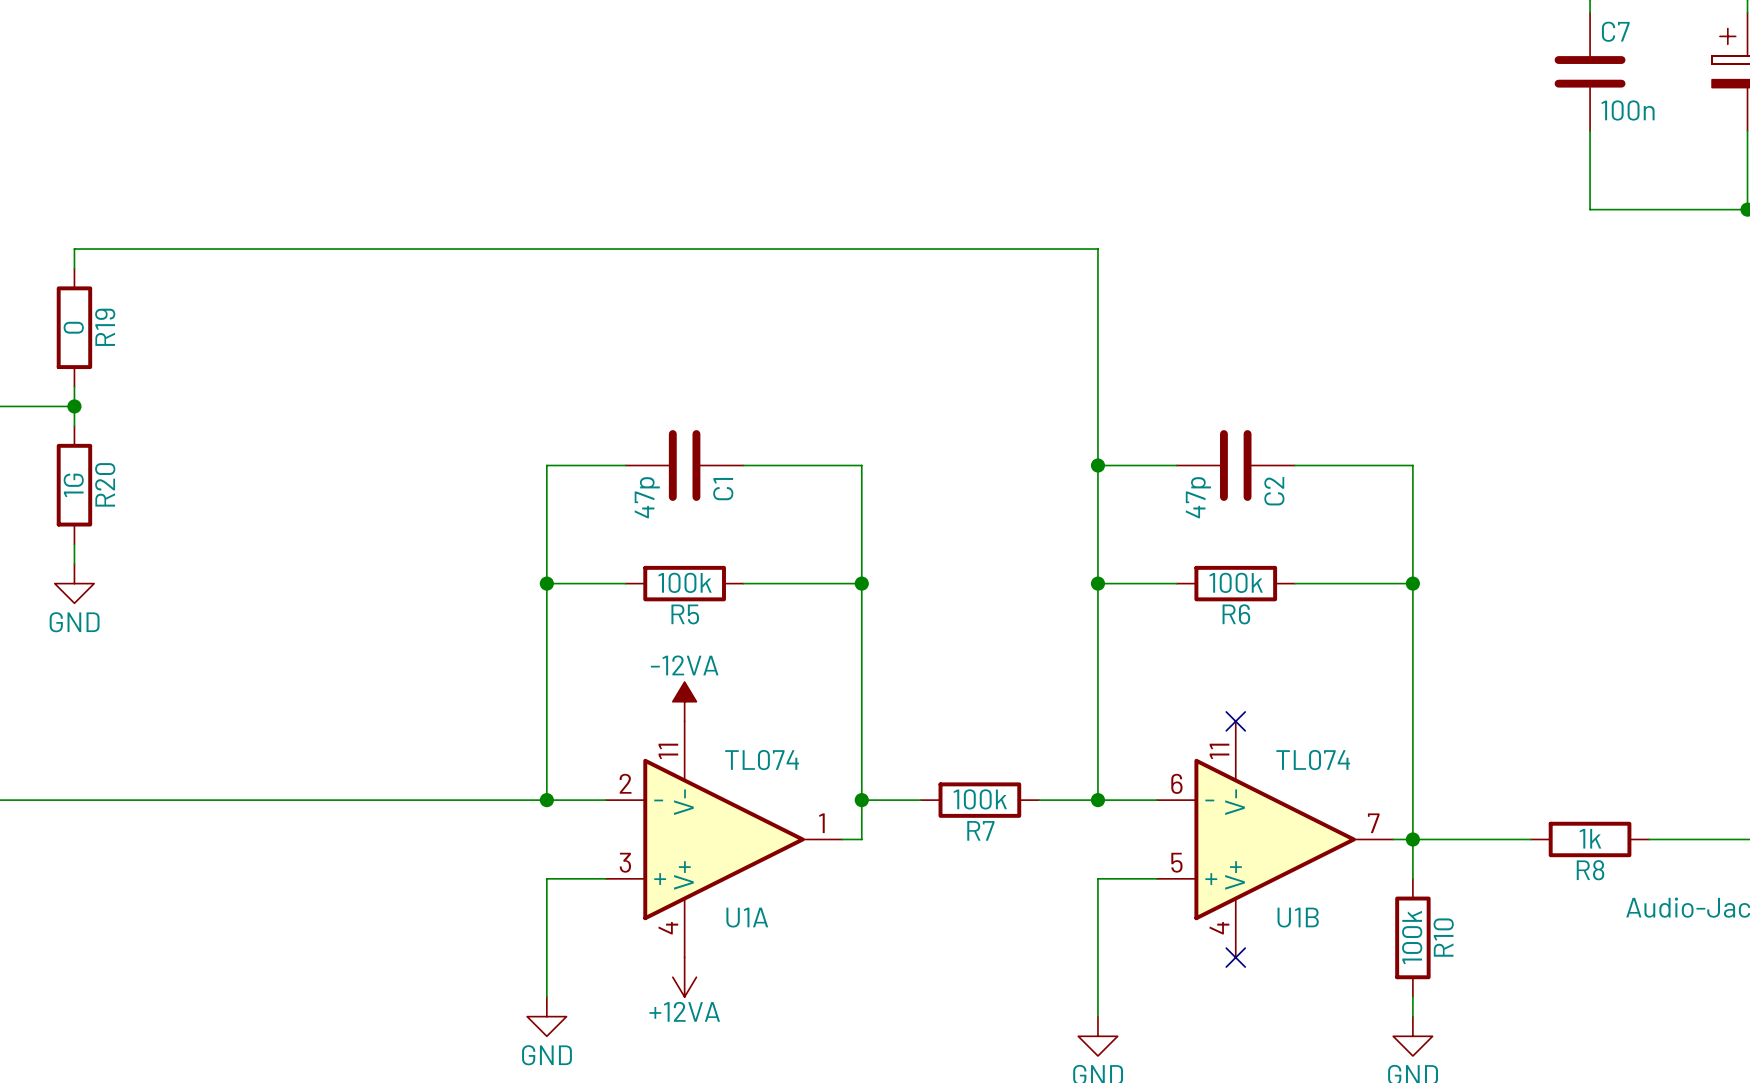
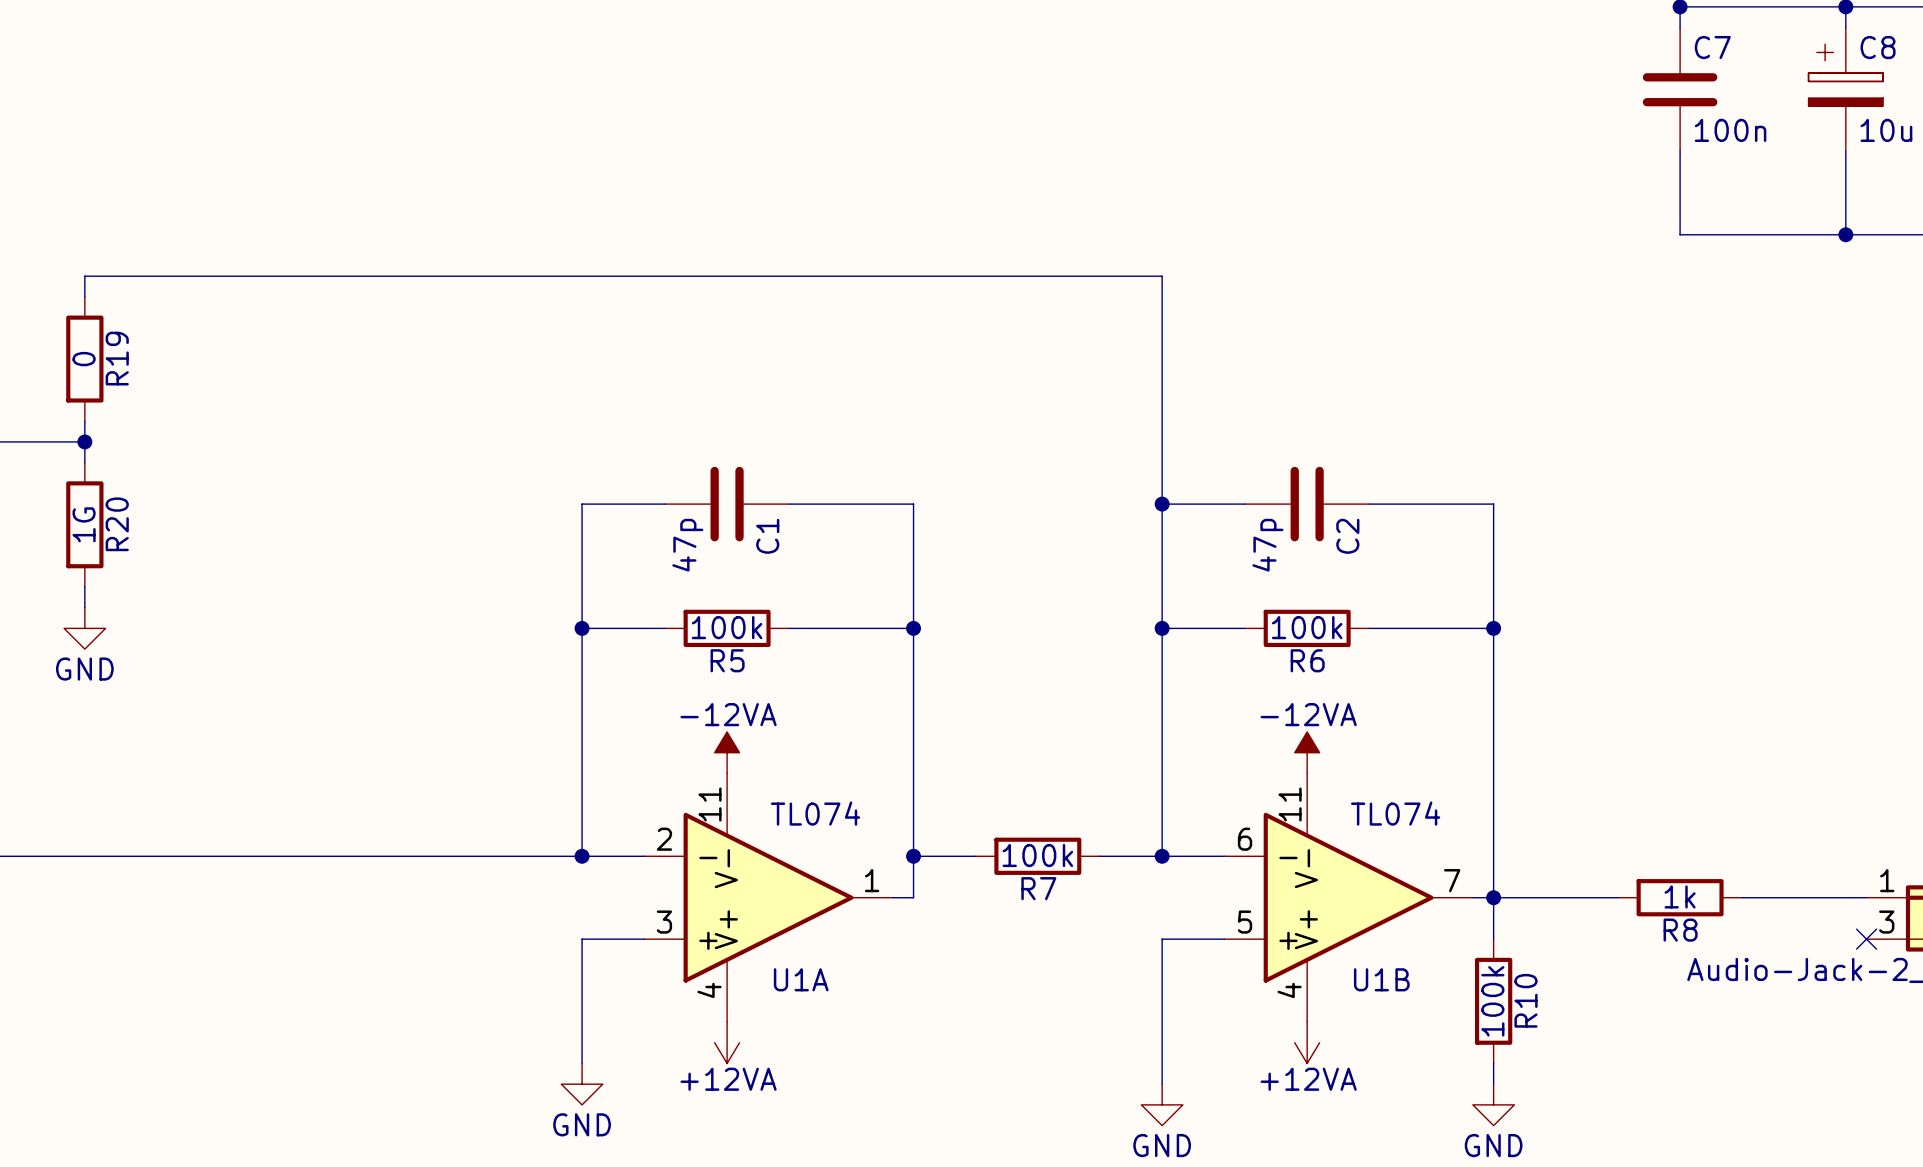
power symbol: none -> -12VA (1307, 752)
no-connect mark: (1235, 721) -> none
no-connect mark: (1235, 957) -> none
power symbol: none -> +12VA (1307, 1042)

